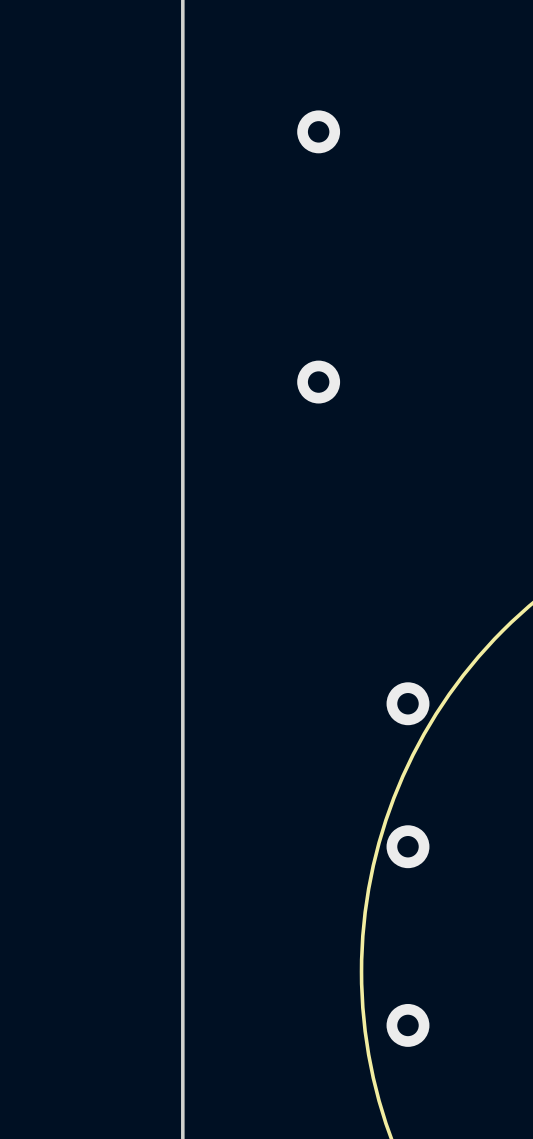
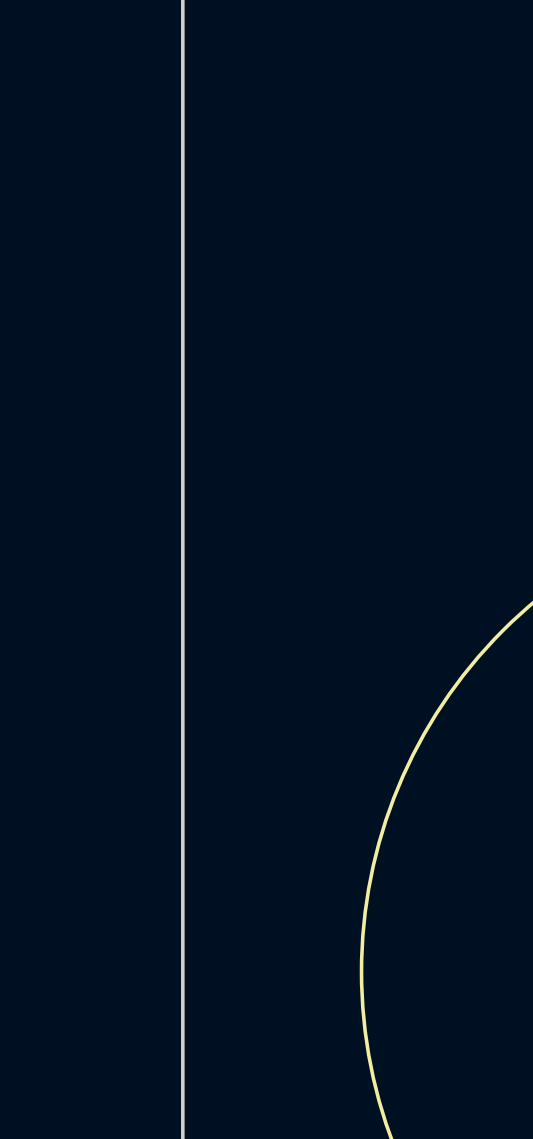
via: (318, 131) -> none
via: (318, 382) -> none
via: (407, 703) -> none
via: (407, 846) -> none
via: (407, 1025) -> none

